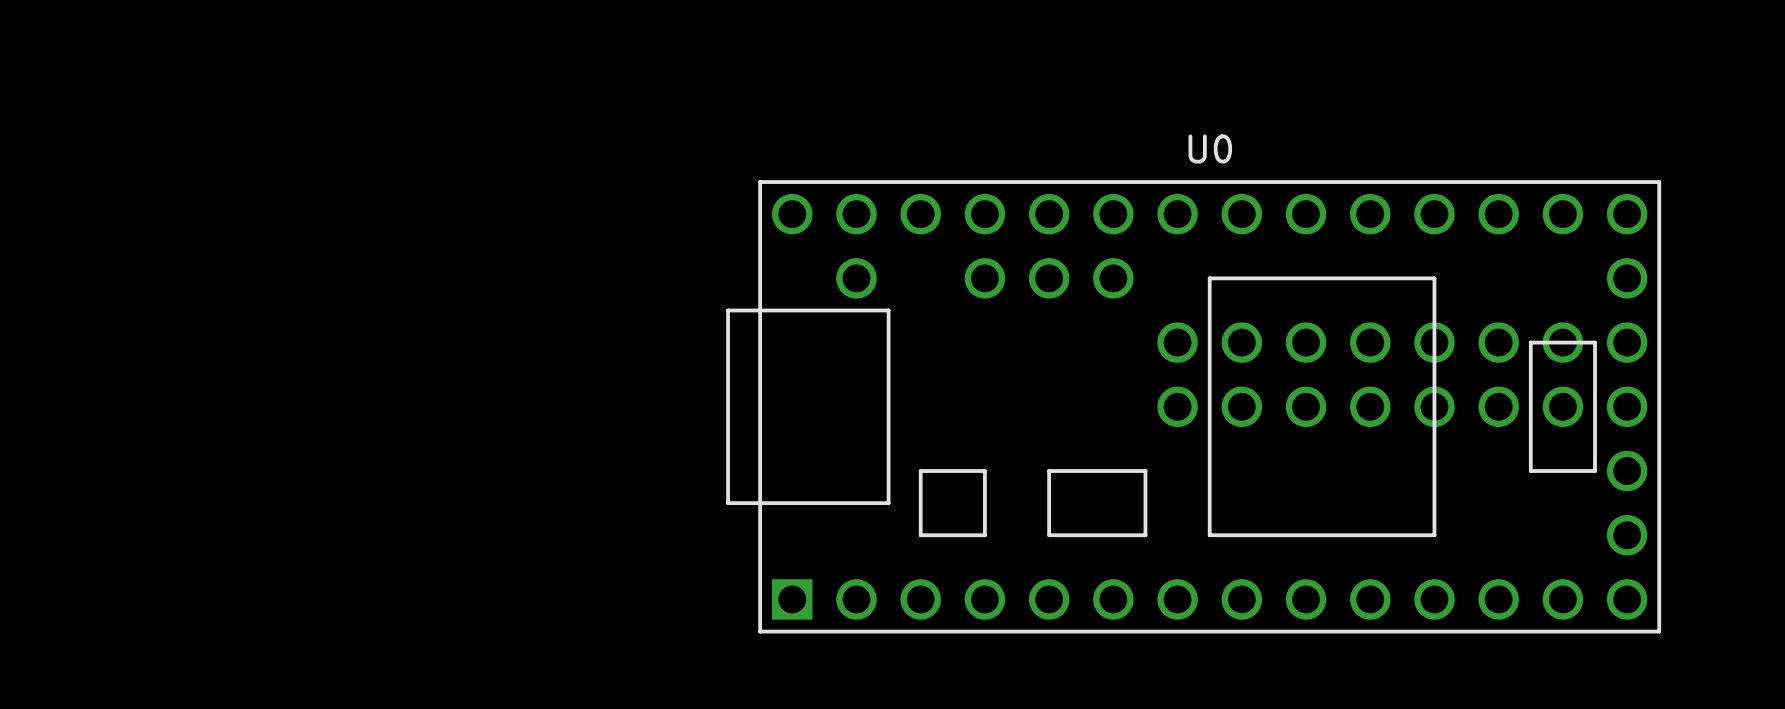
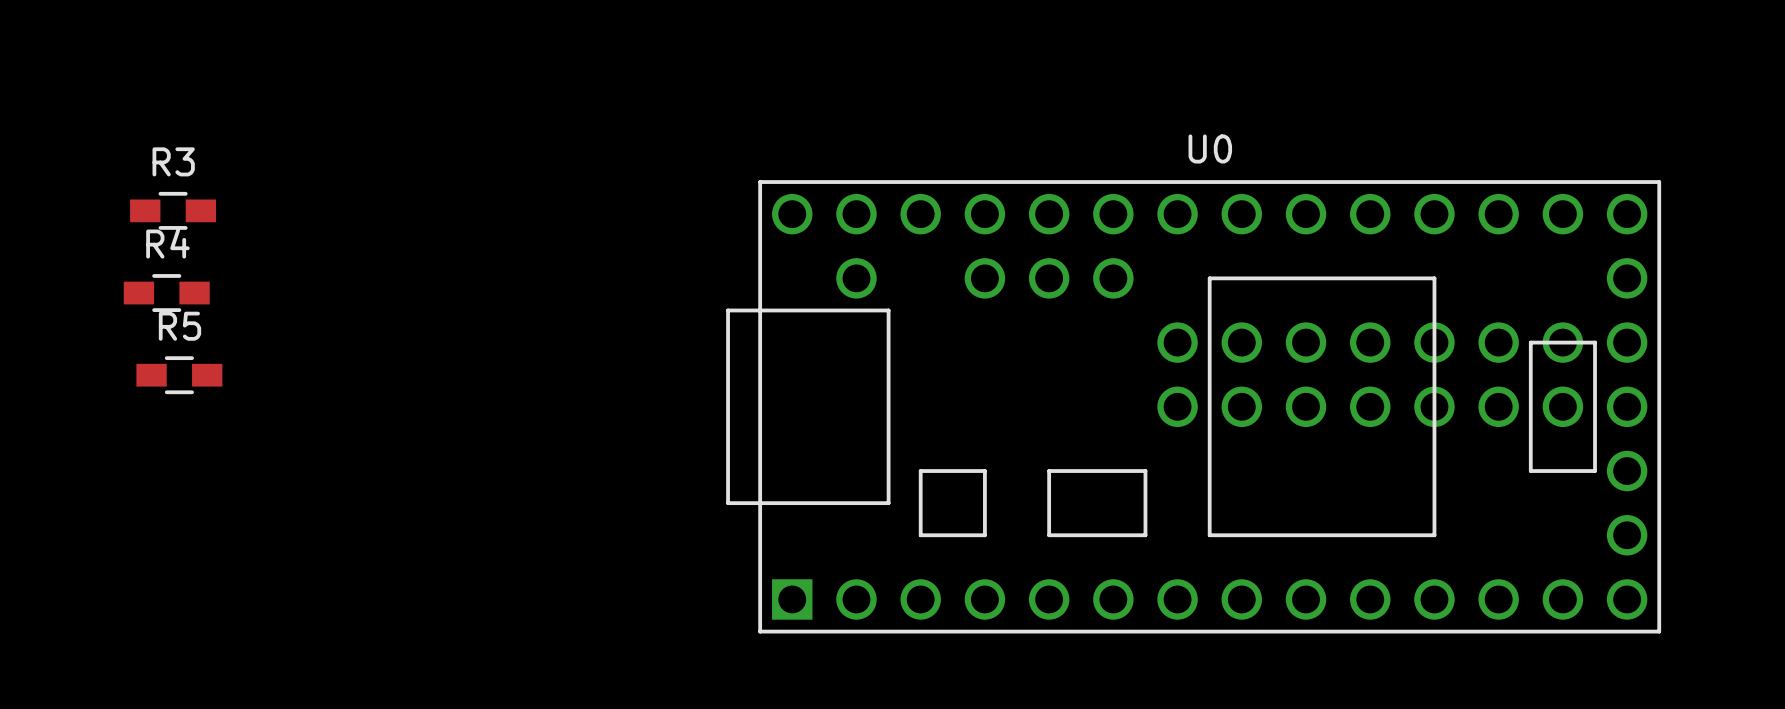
R3: none -> (173, 210)
R4: none -> (166, 293)
R5: none -> (179, 375)

